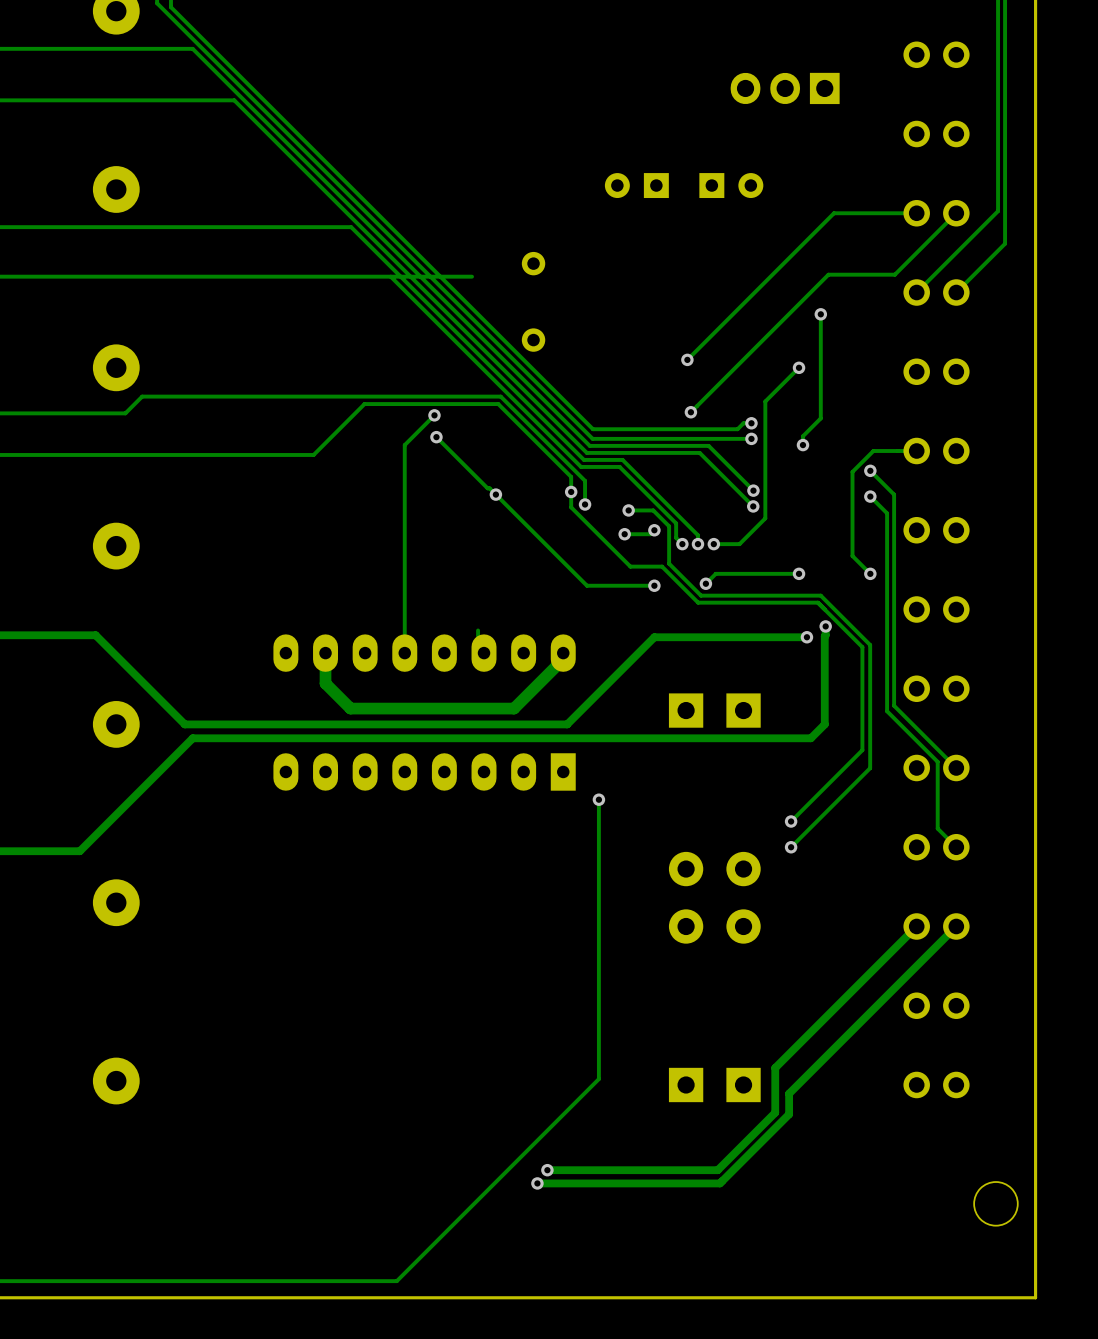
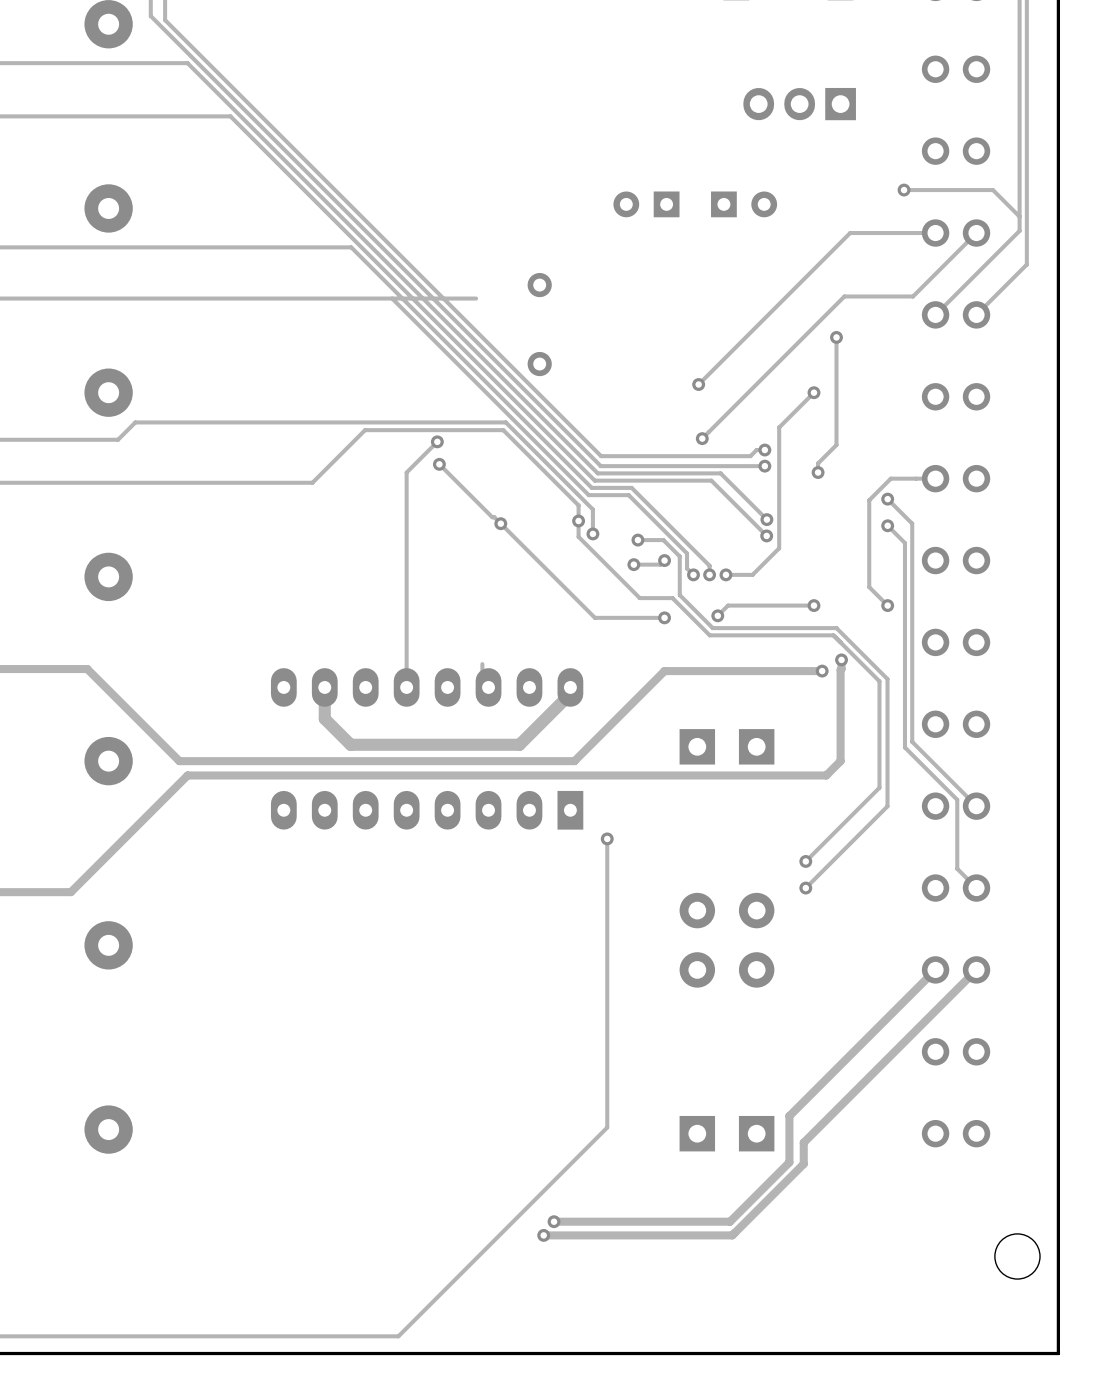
track: none -> (904, 190) (993, 190) (1019, 216)
via: none -> (904, 190)

